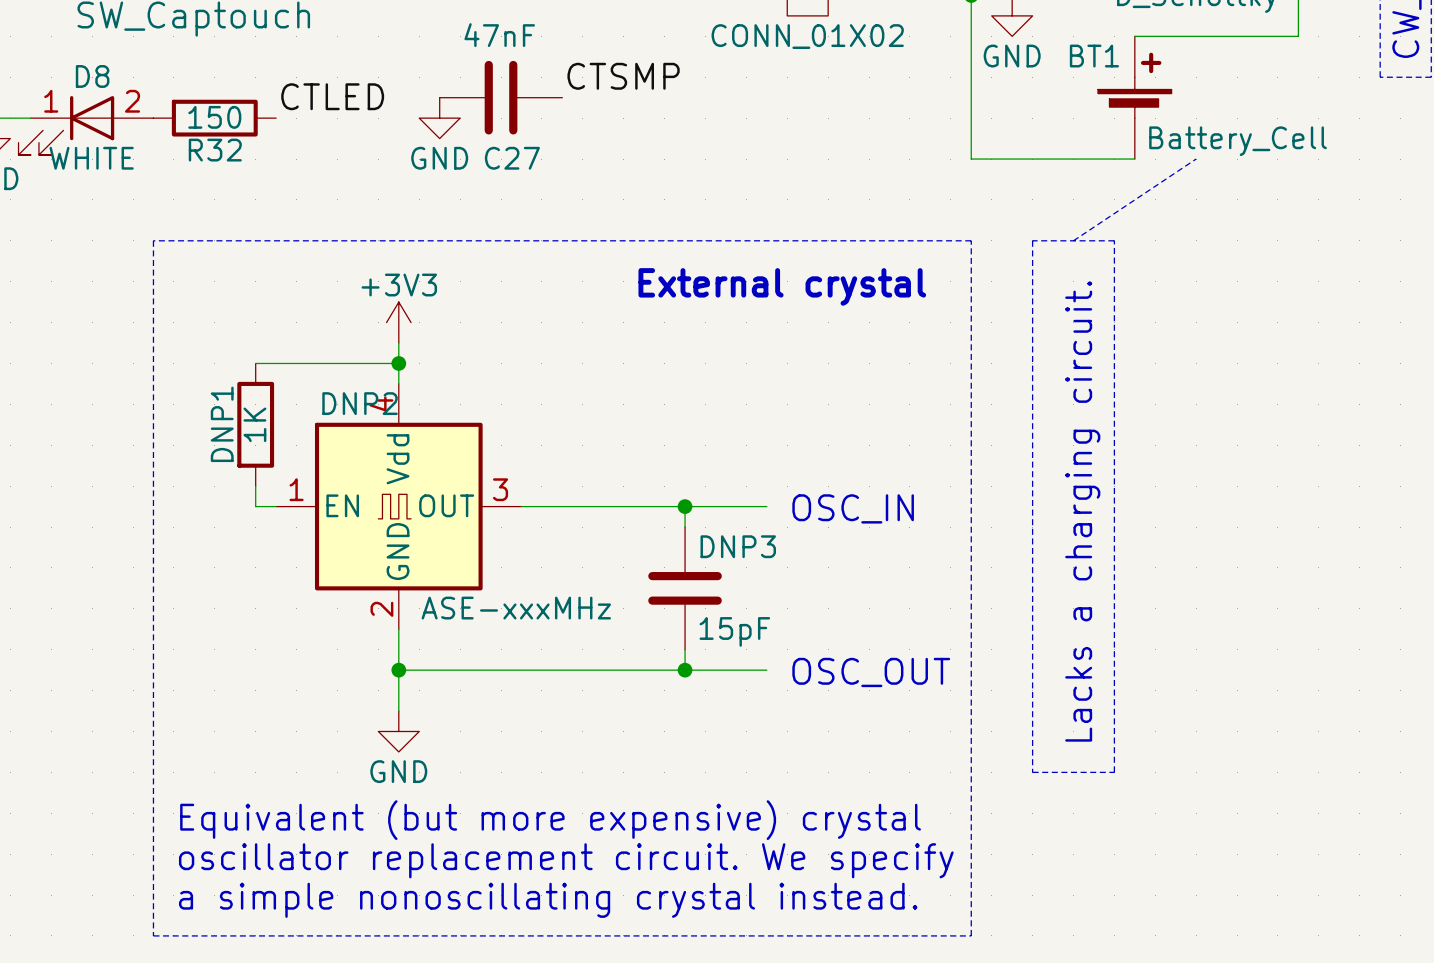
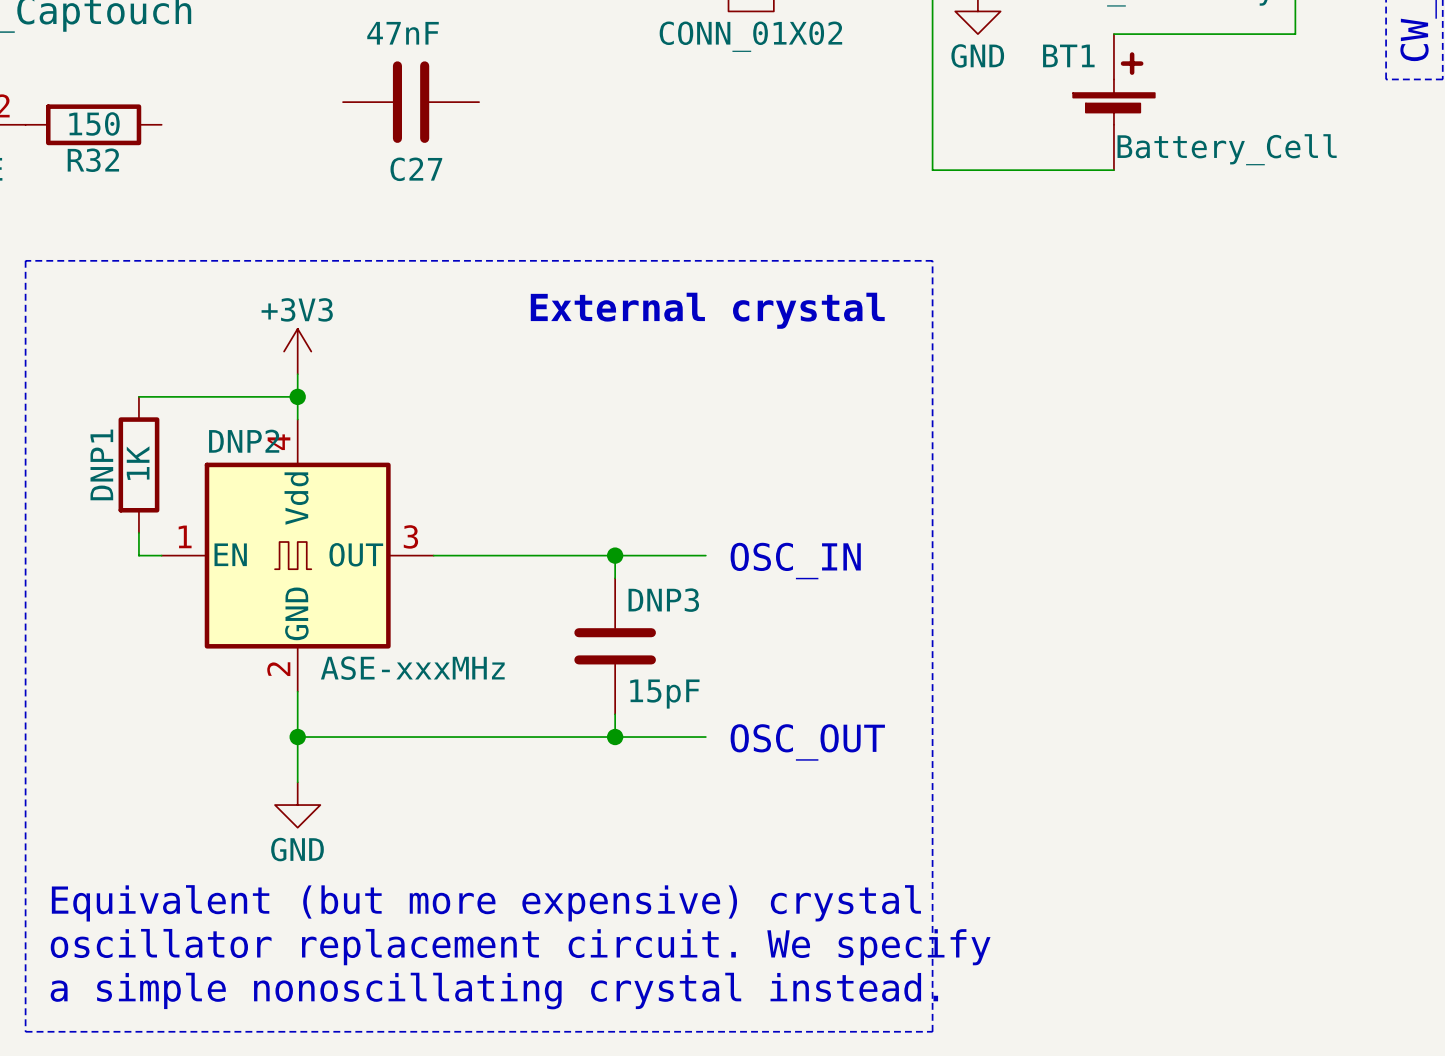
label: CTSMP (623, 76) -> none
label: CTLED (332, 96) -> none
power symbol: GND (439, 118) -> none
line: (1196, 159) (1073, 240) -> none
line: (1032, 240) (1032, 772) (1114, 772) (1114, 240) (1032, 240) -> none
text: Lacks a charging circuit. (1082, 511) -> none

